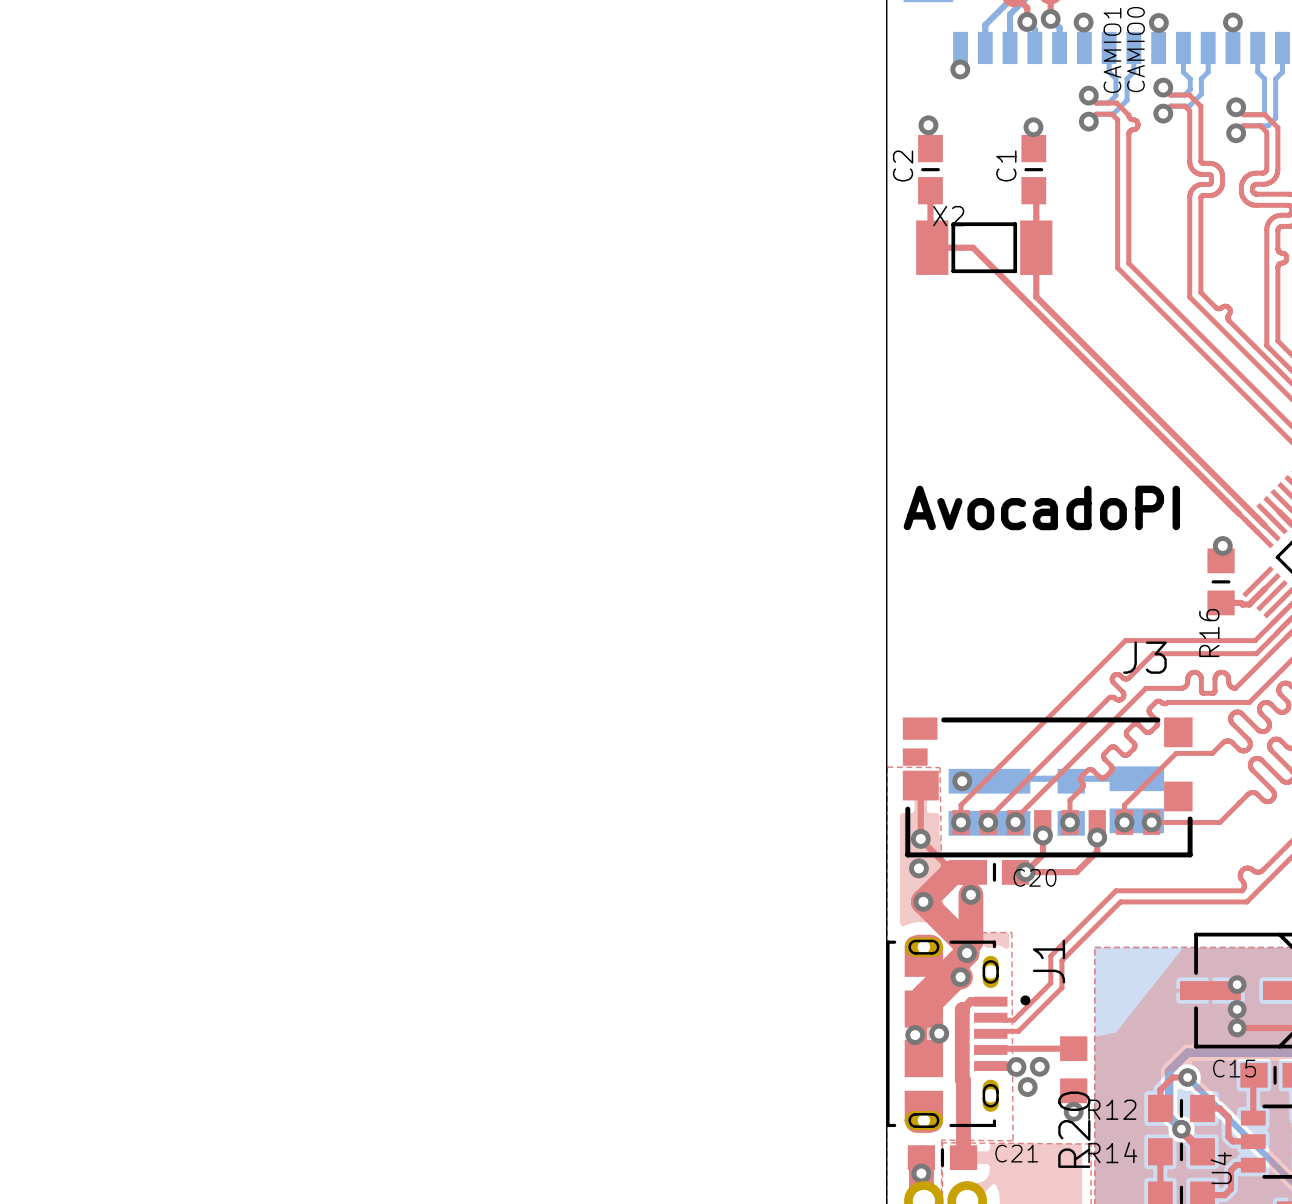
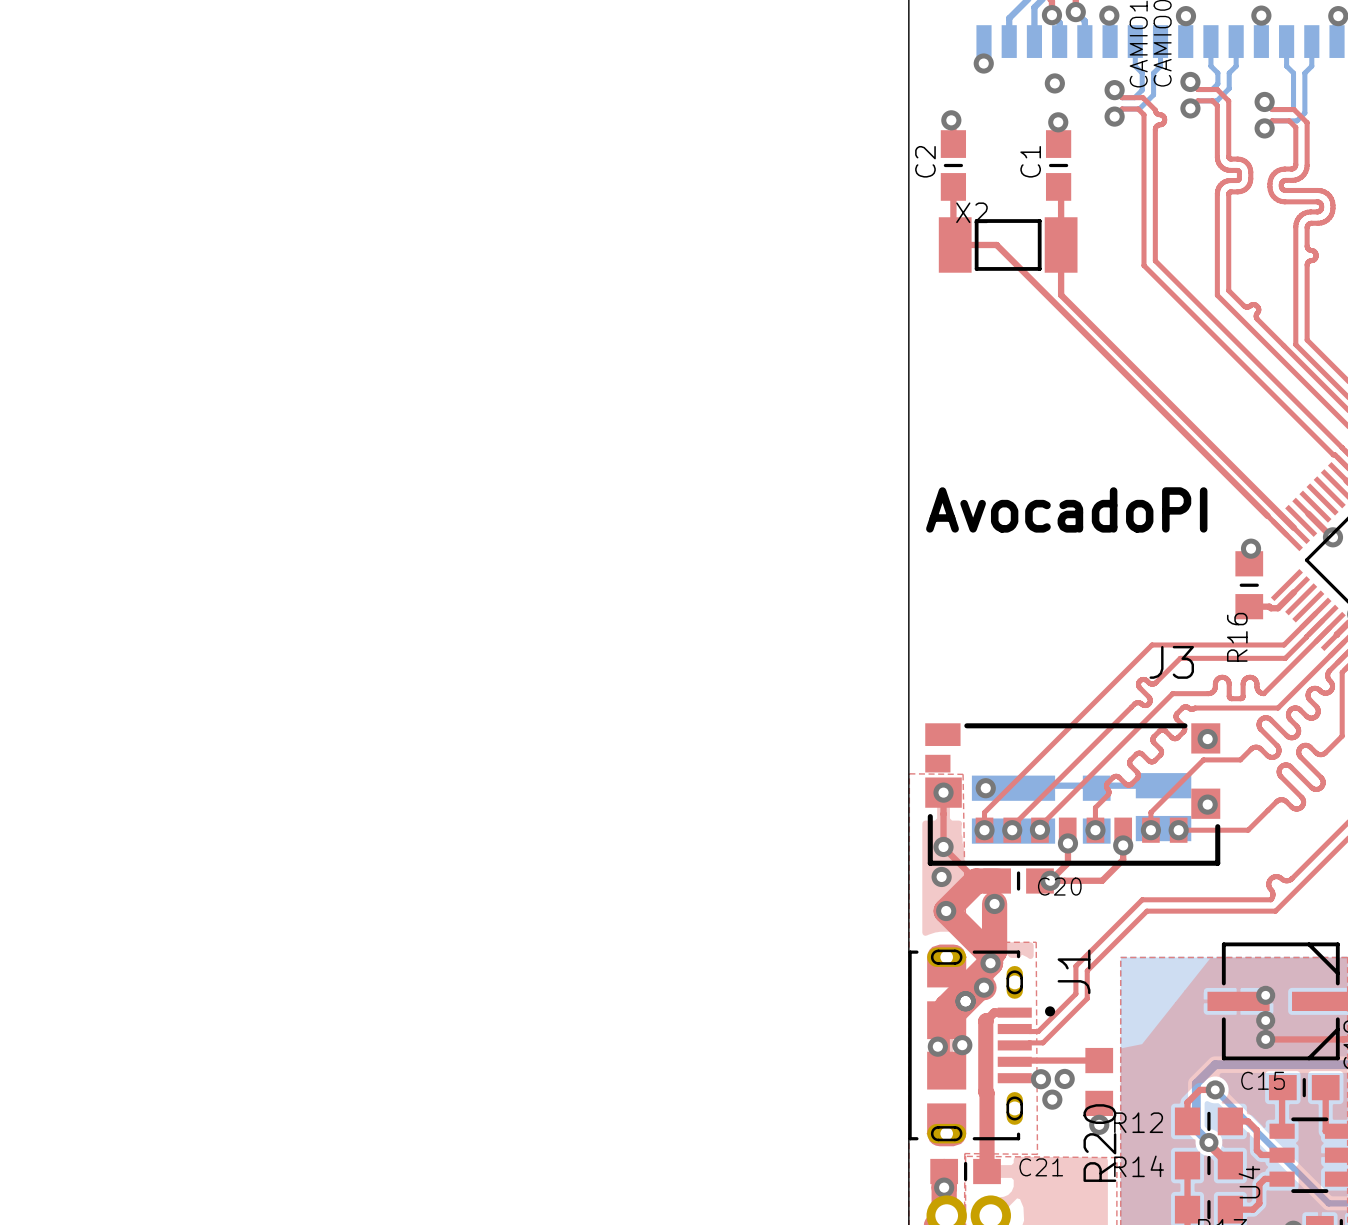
via: none -> (1054, 83)
via: none -> (1207, 739)
via: none -> (943, 792)
via: none -> (1207, 804)
via: none -> (965, 1001)

